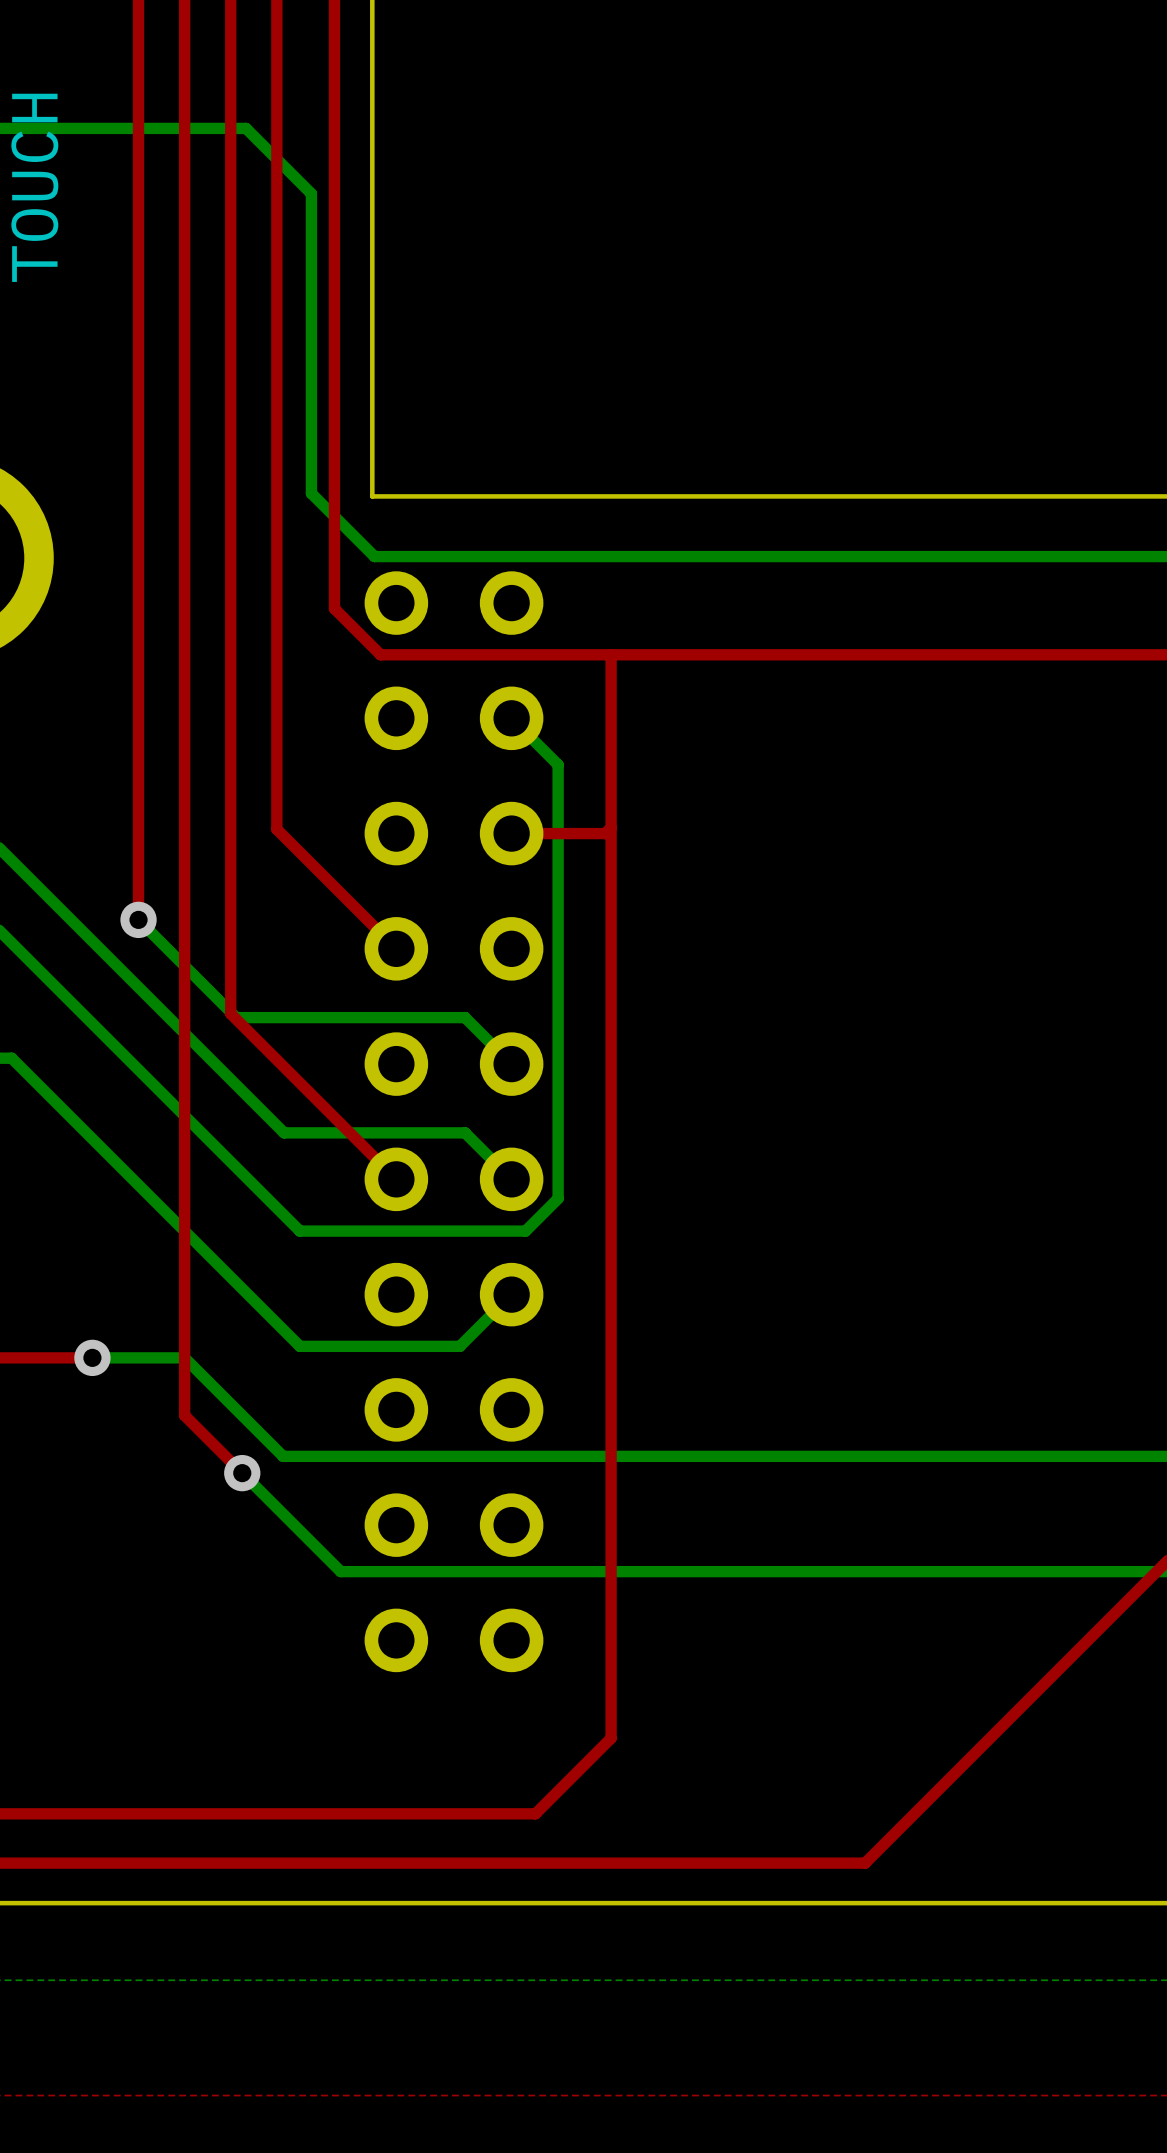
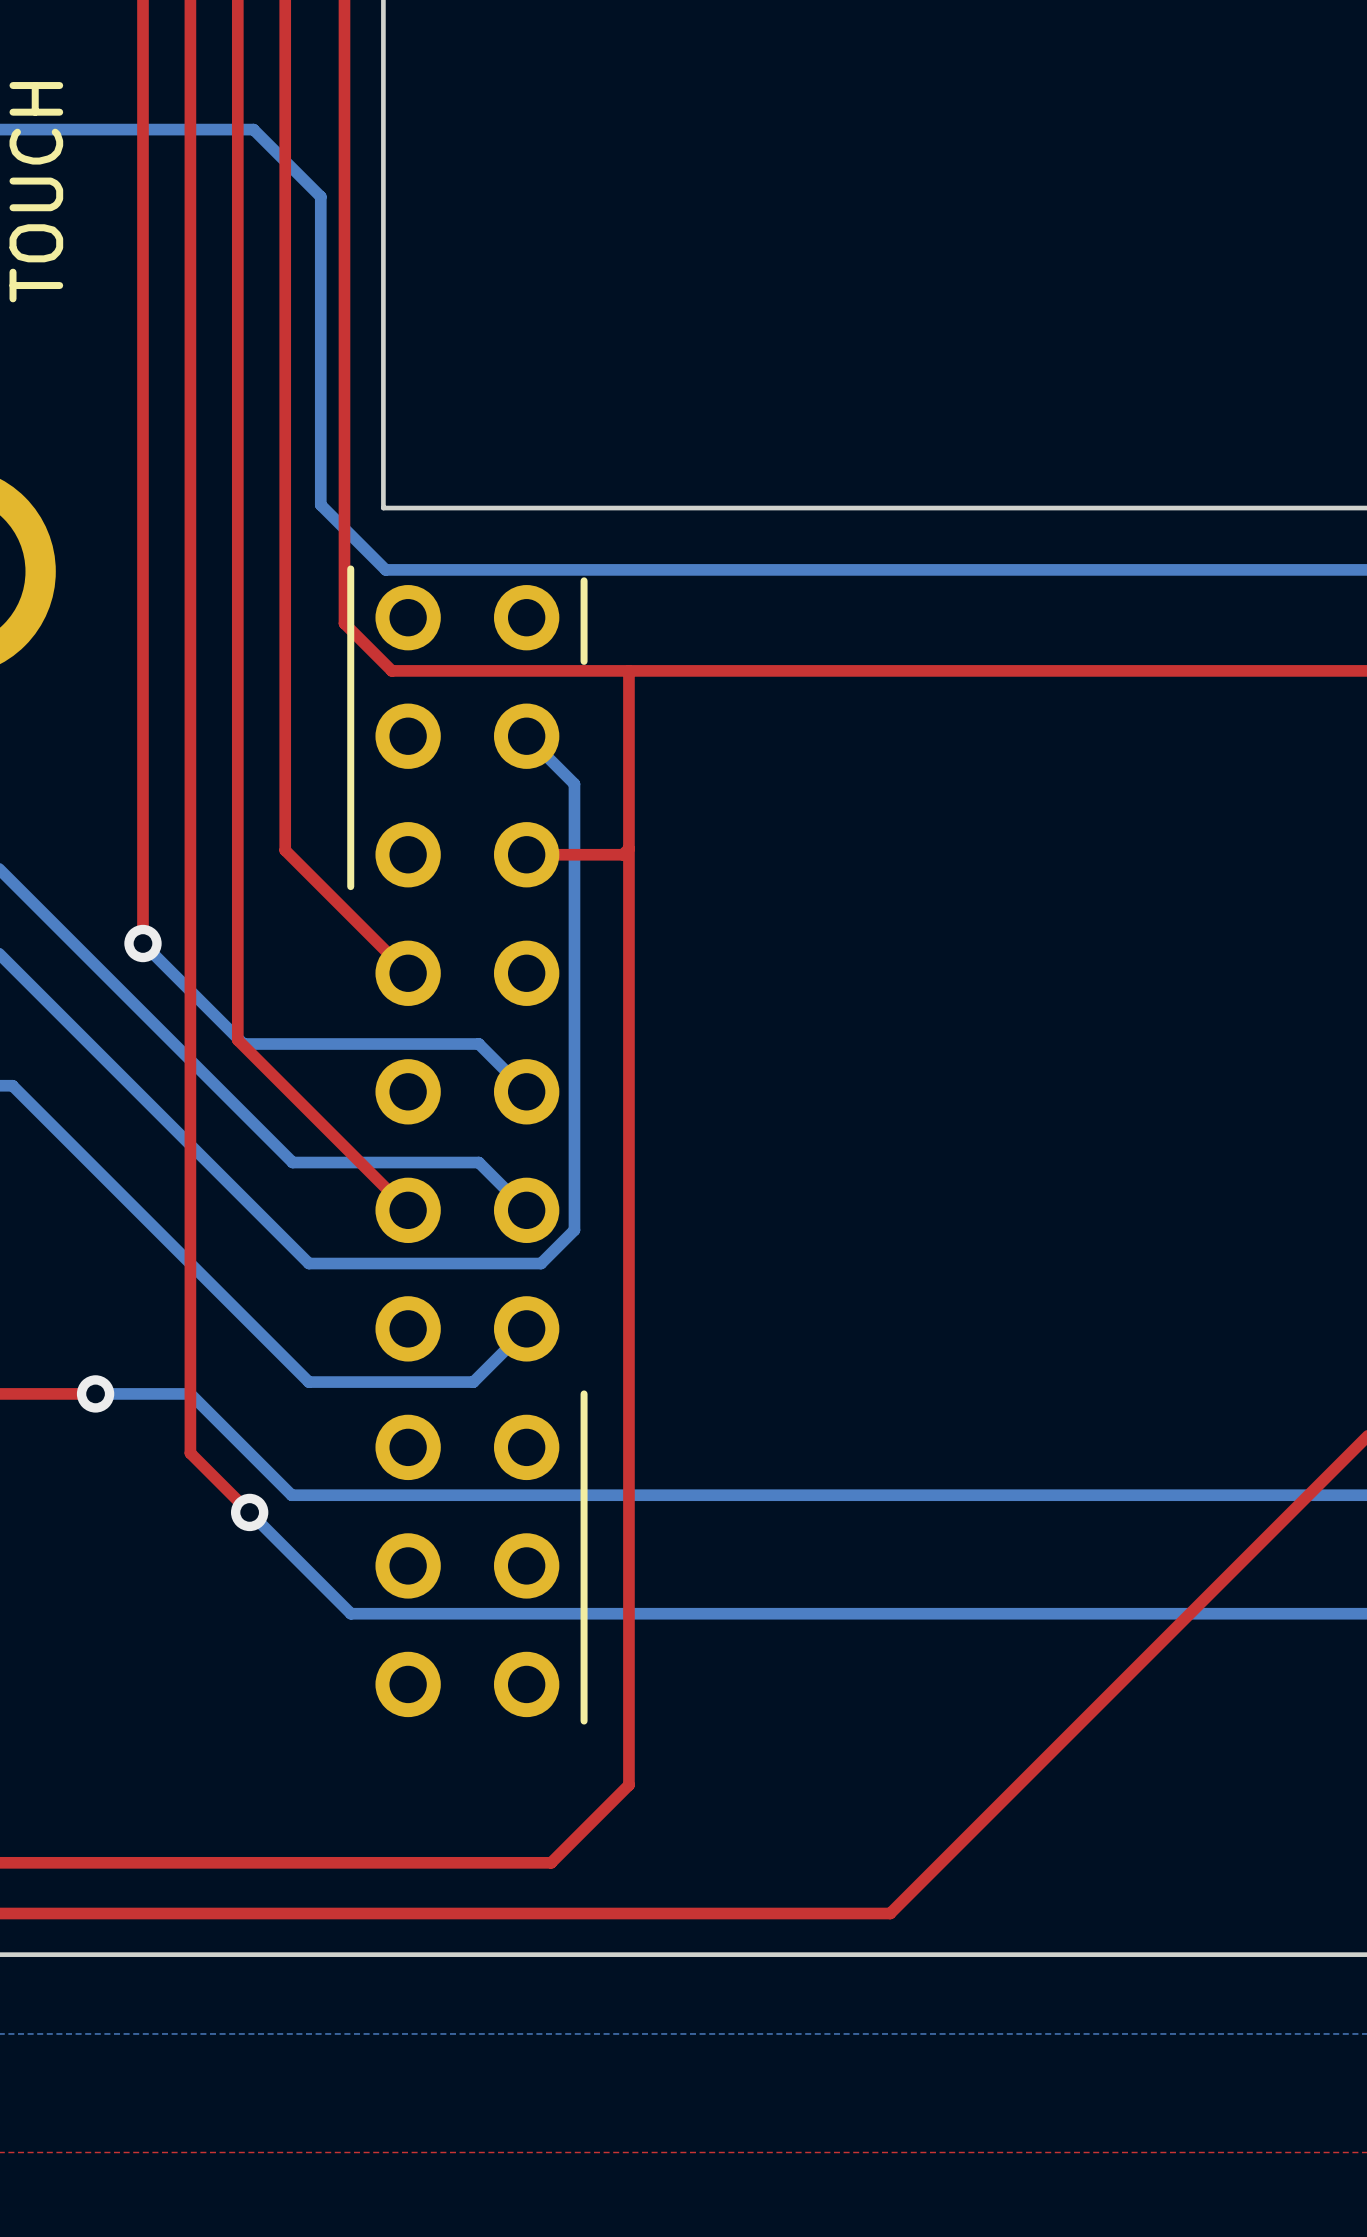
line: none -> (350, 568) (350, 886)
line: none -> (584, 580) (584, 661)
line: none -> (584, 1393) (584, 1721)

